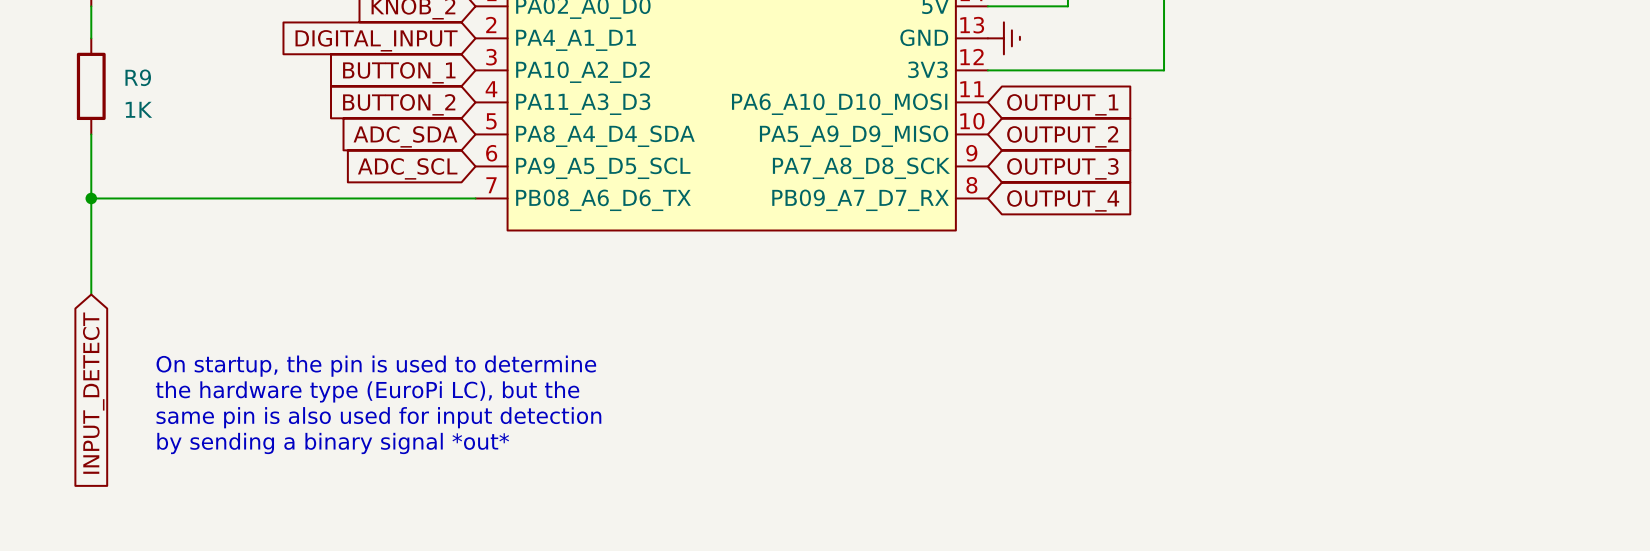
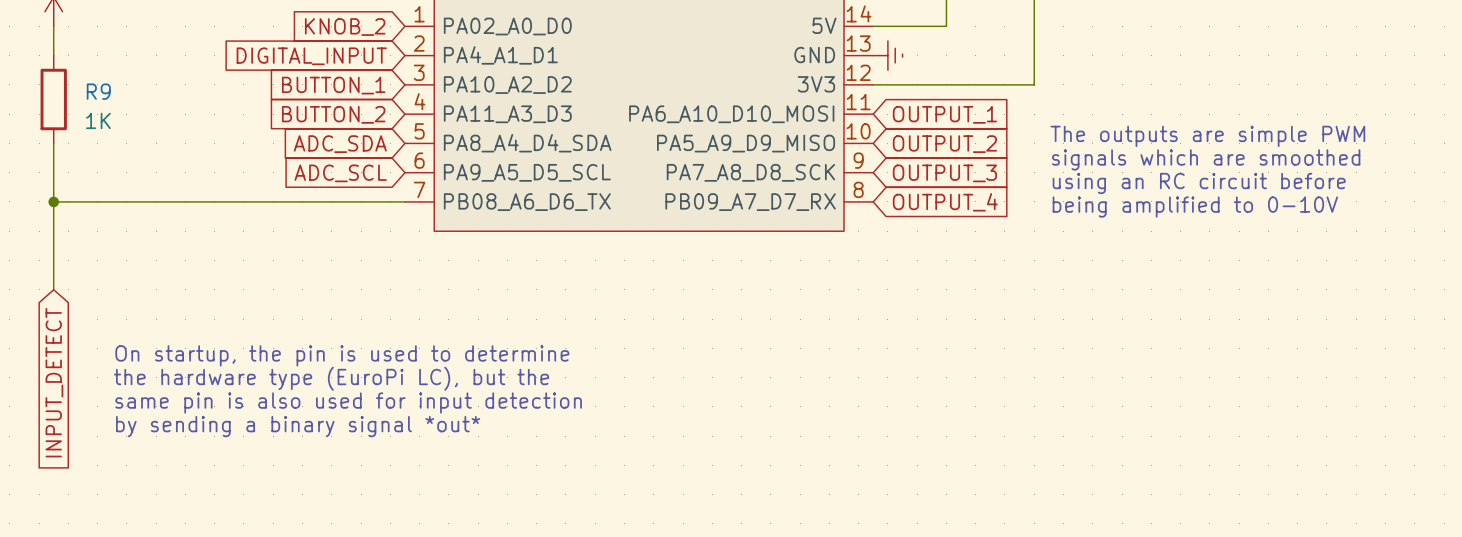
text: none -> The outputs are simple PWM (1207, 136)
text: none -> signals which are smoothed (1206, 159)
text: none -> using an RC circuit before (1199, 183)
text: none -> being amplified to 0-10V (1195, 207)

